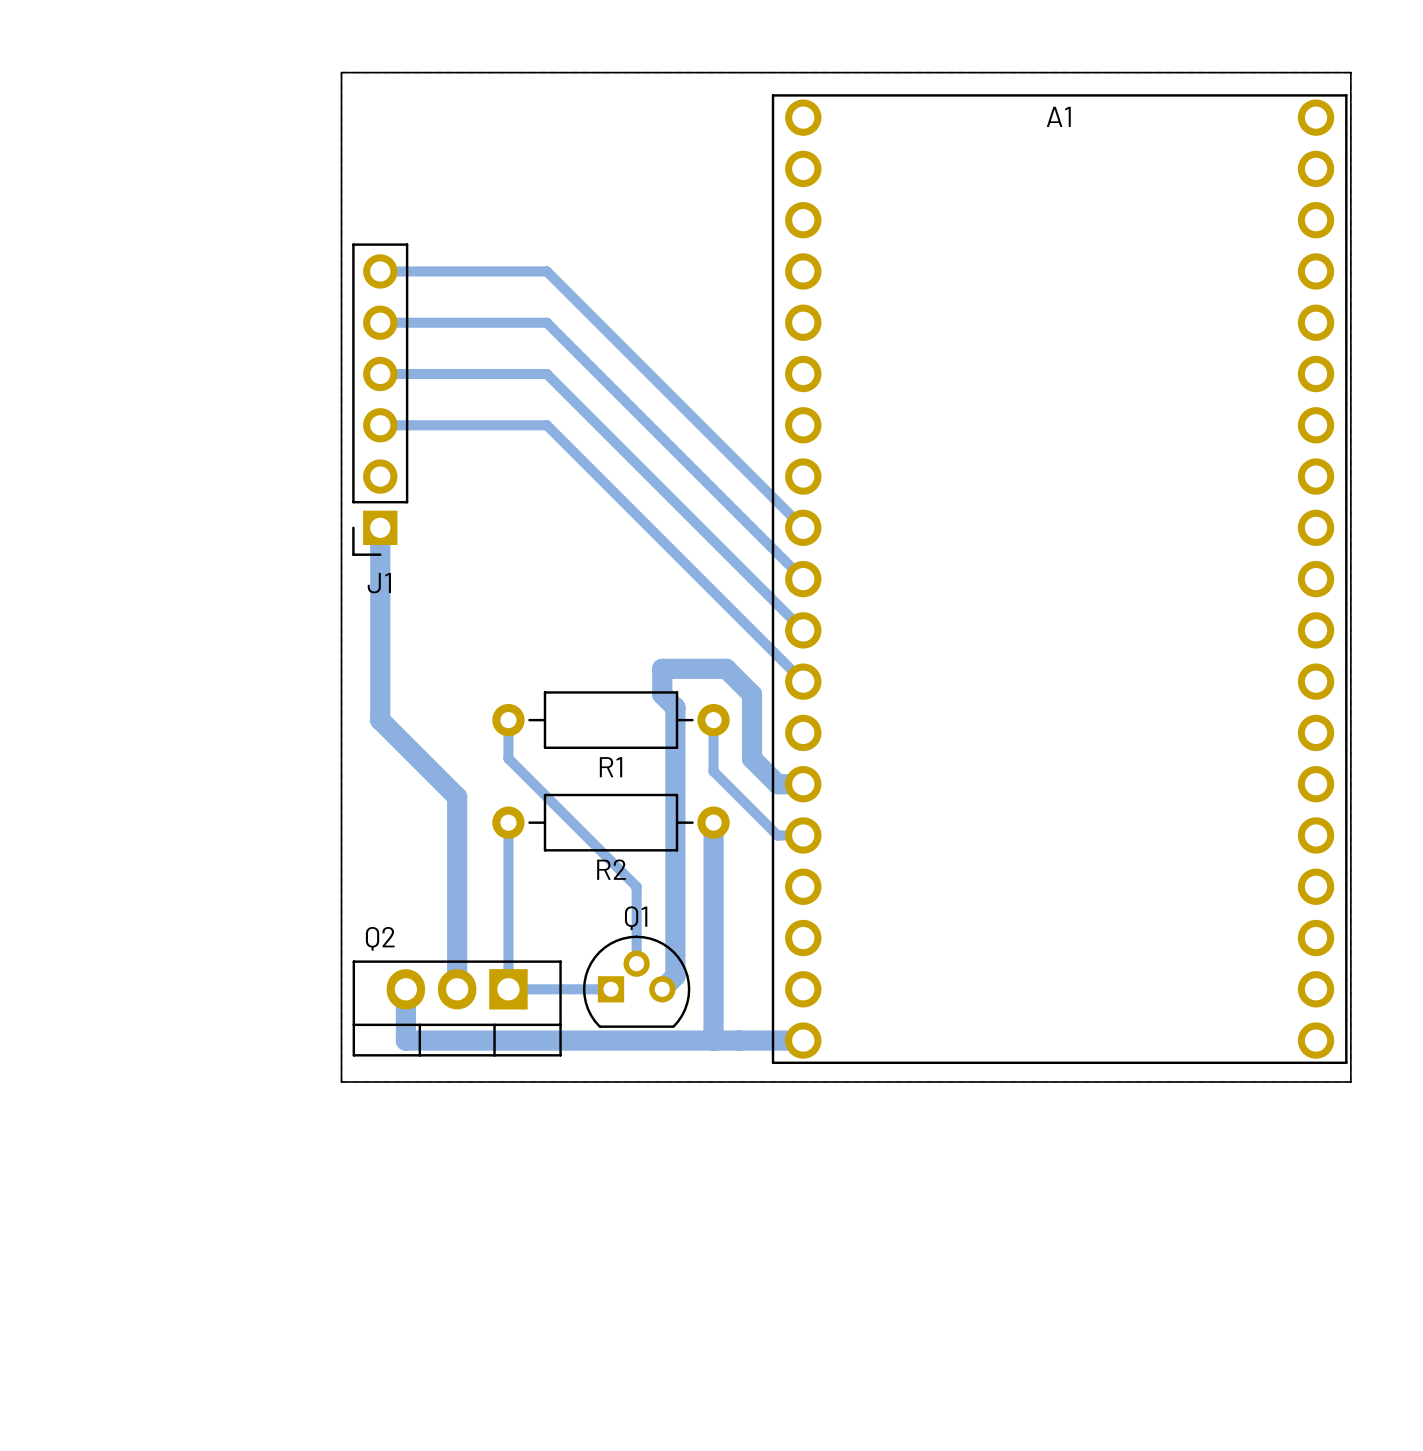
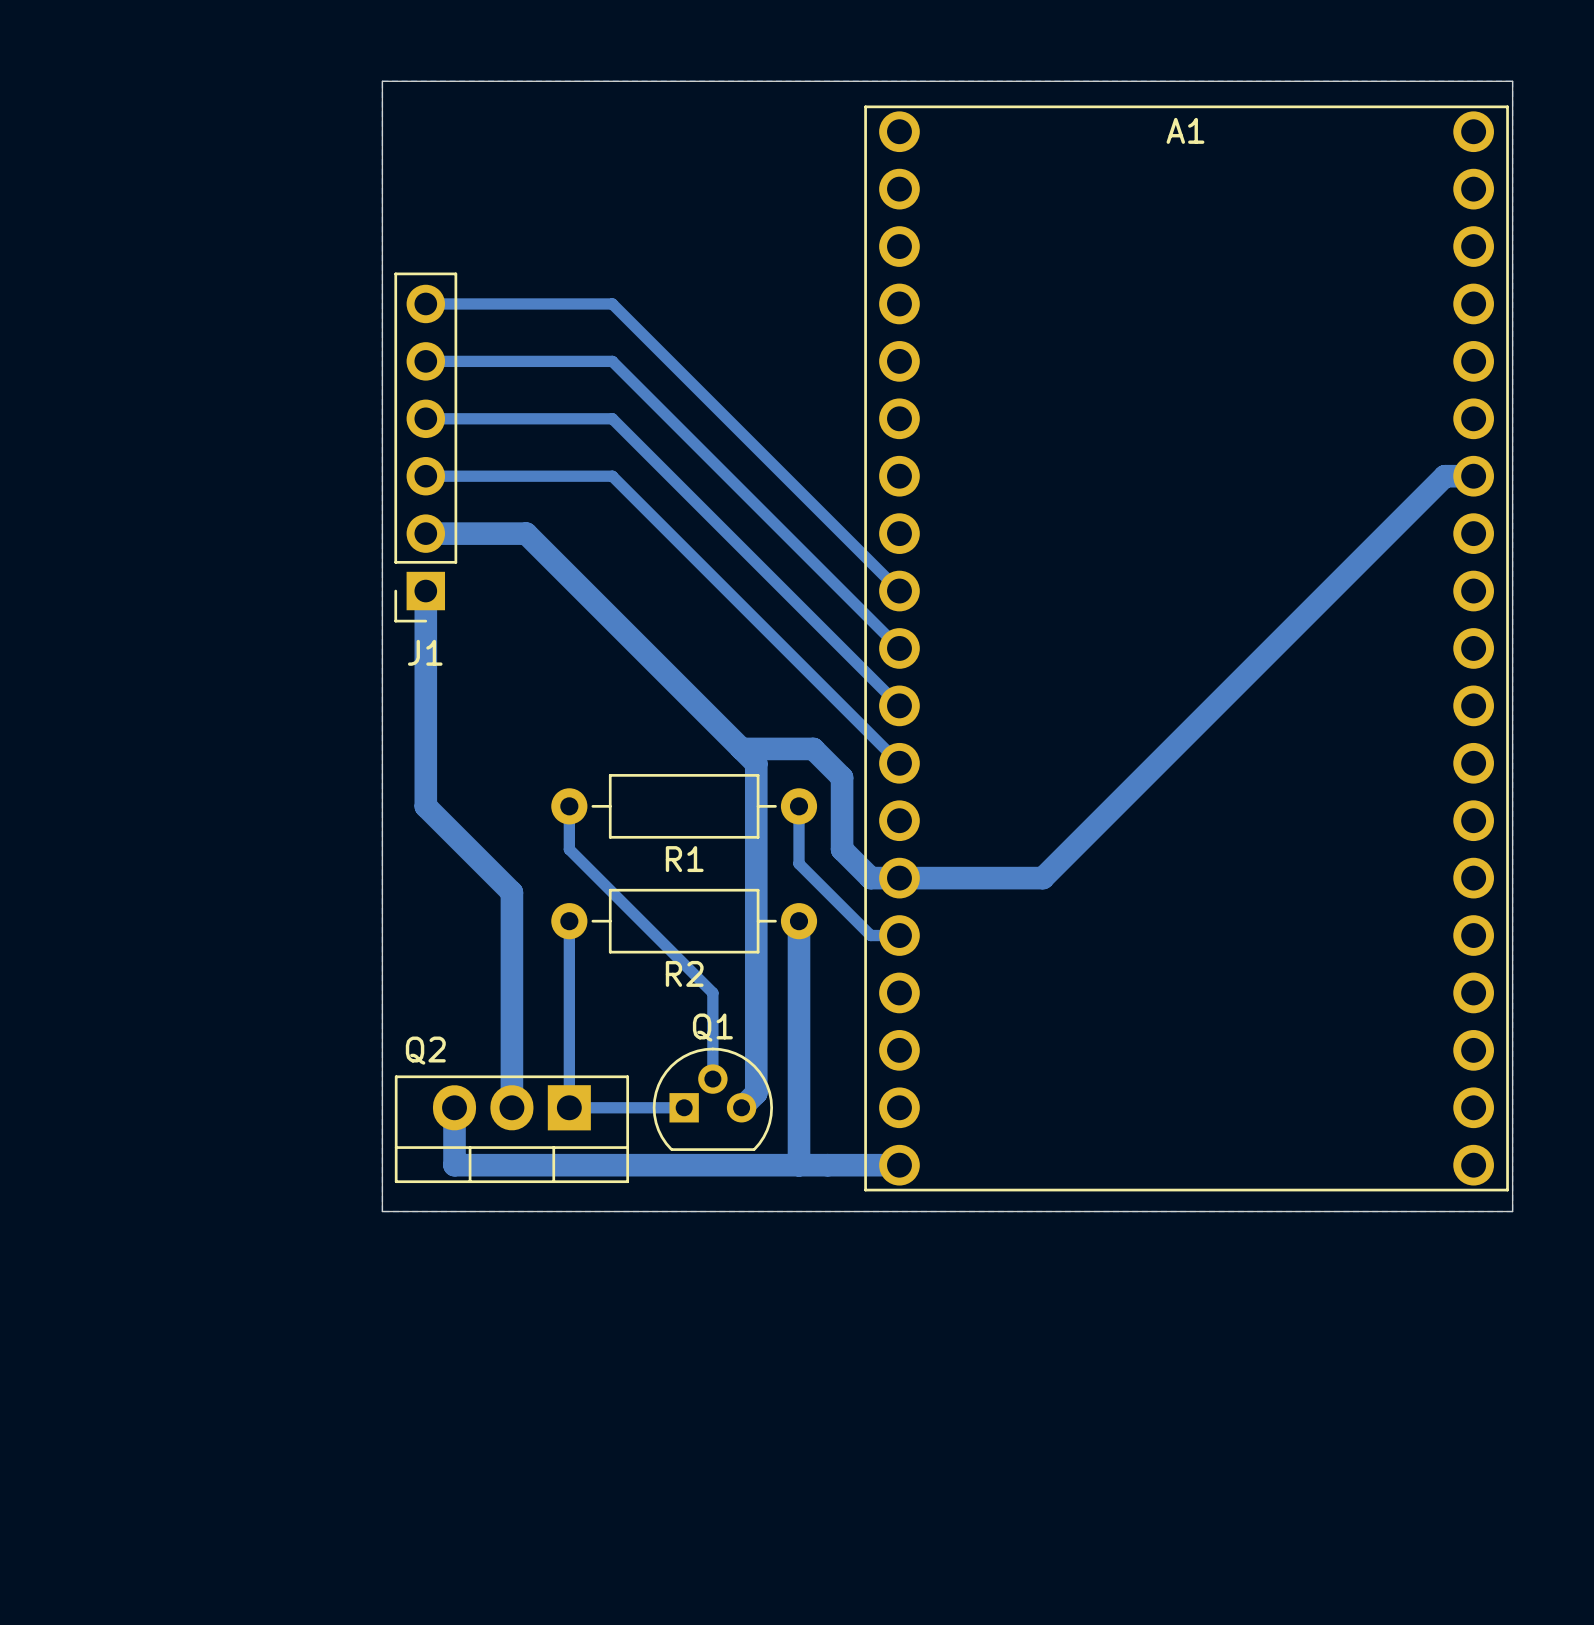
bottom track: none -> (1473, 476) (1444, 476) (1042, 878) (899, 878)
bottom track: (662, 668) (662, 694) (675, 707) -> (425, 533) (526, 533) (756, 763) (756, 792)

